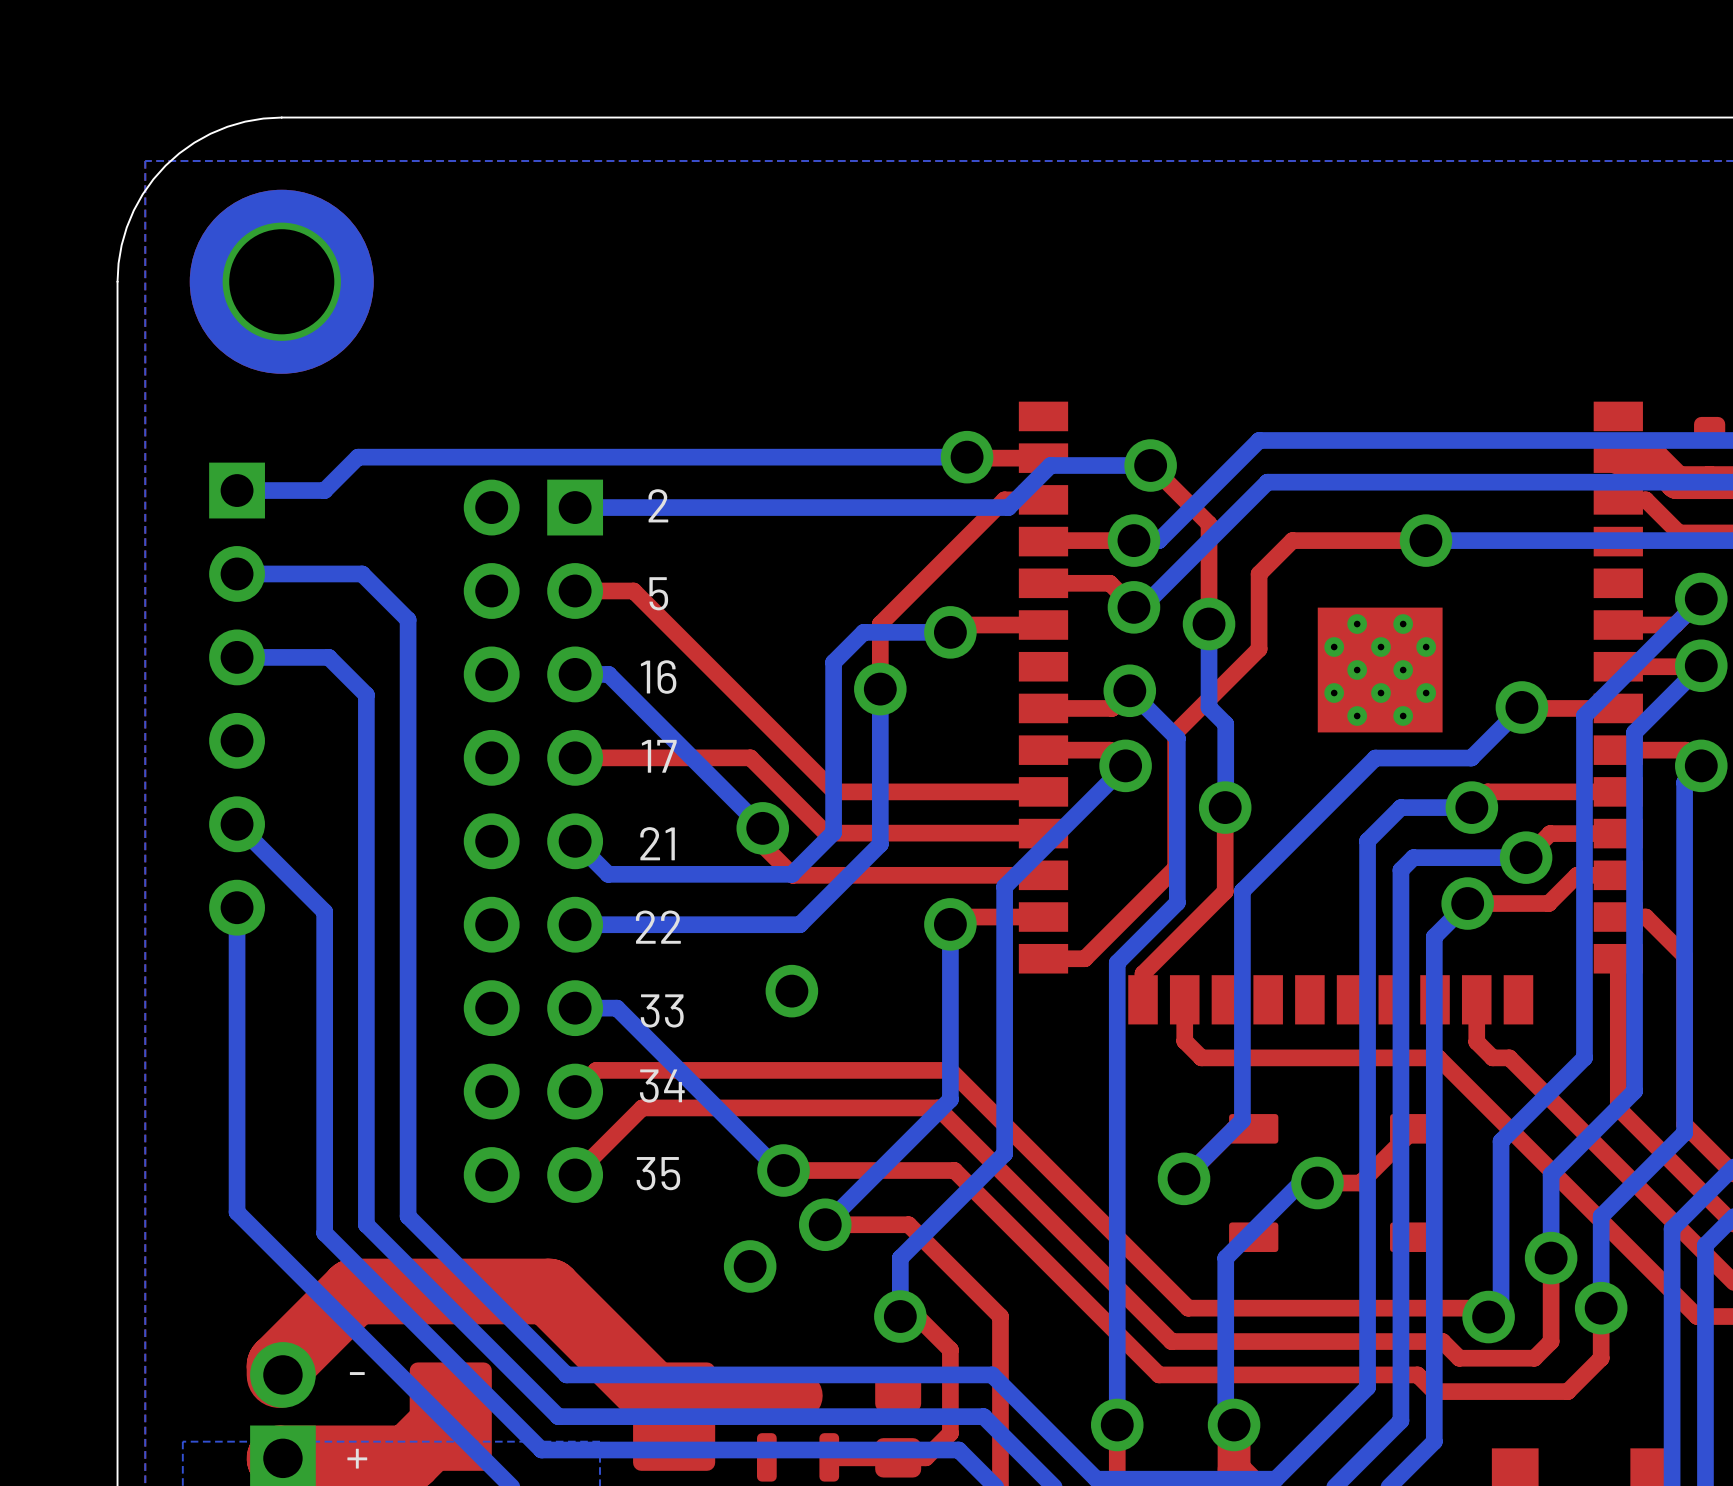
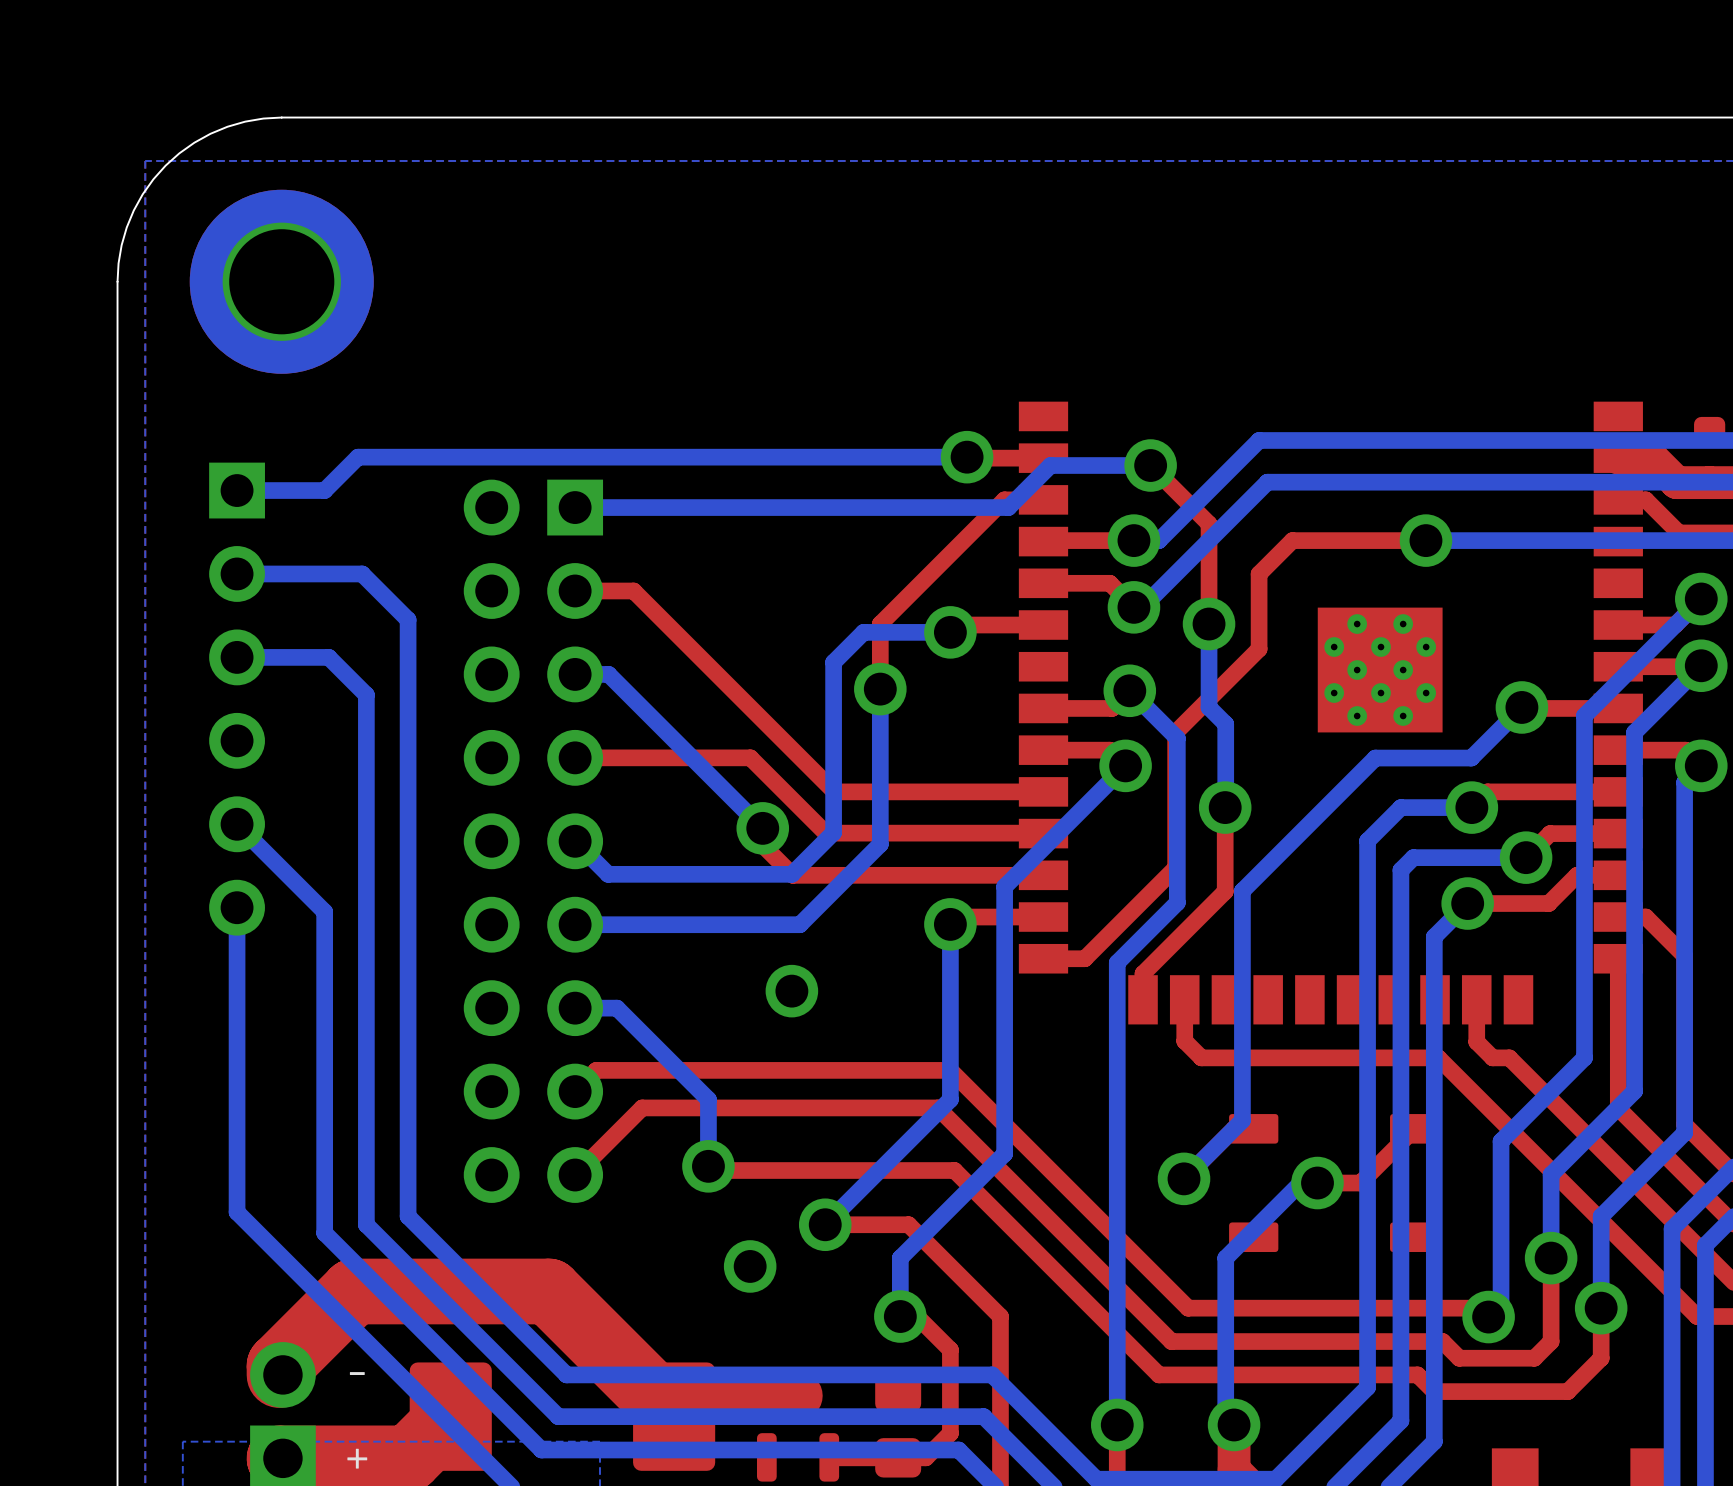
text: 2 (658, 505) -> none
text: 5 (658, 593) -> none
text: 16 (658, 677) -> none
text: 17 (659, 756) -> none
text: 21 (657, 843) -> none
text: 22 (658, 927) -> none
text: 33 (662, 1010) -> none
text: 34 (662, 1086) -> none
bottom track: (708, 1099) (779, 1170) (783, 1170) -> (708, 1099) (708, 1166)
top track: none -> (708, 1166) (712, 1170) (783, 1170)
via position: (783, 1170) -> (708, 1166)
text: 35 (658, 1173) -> none

